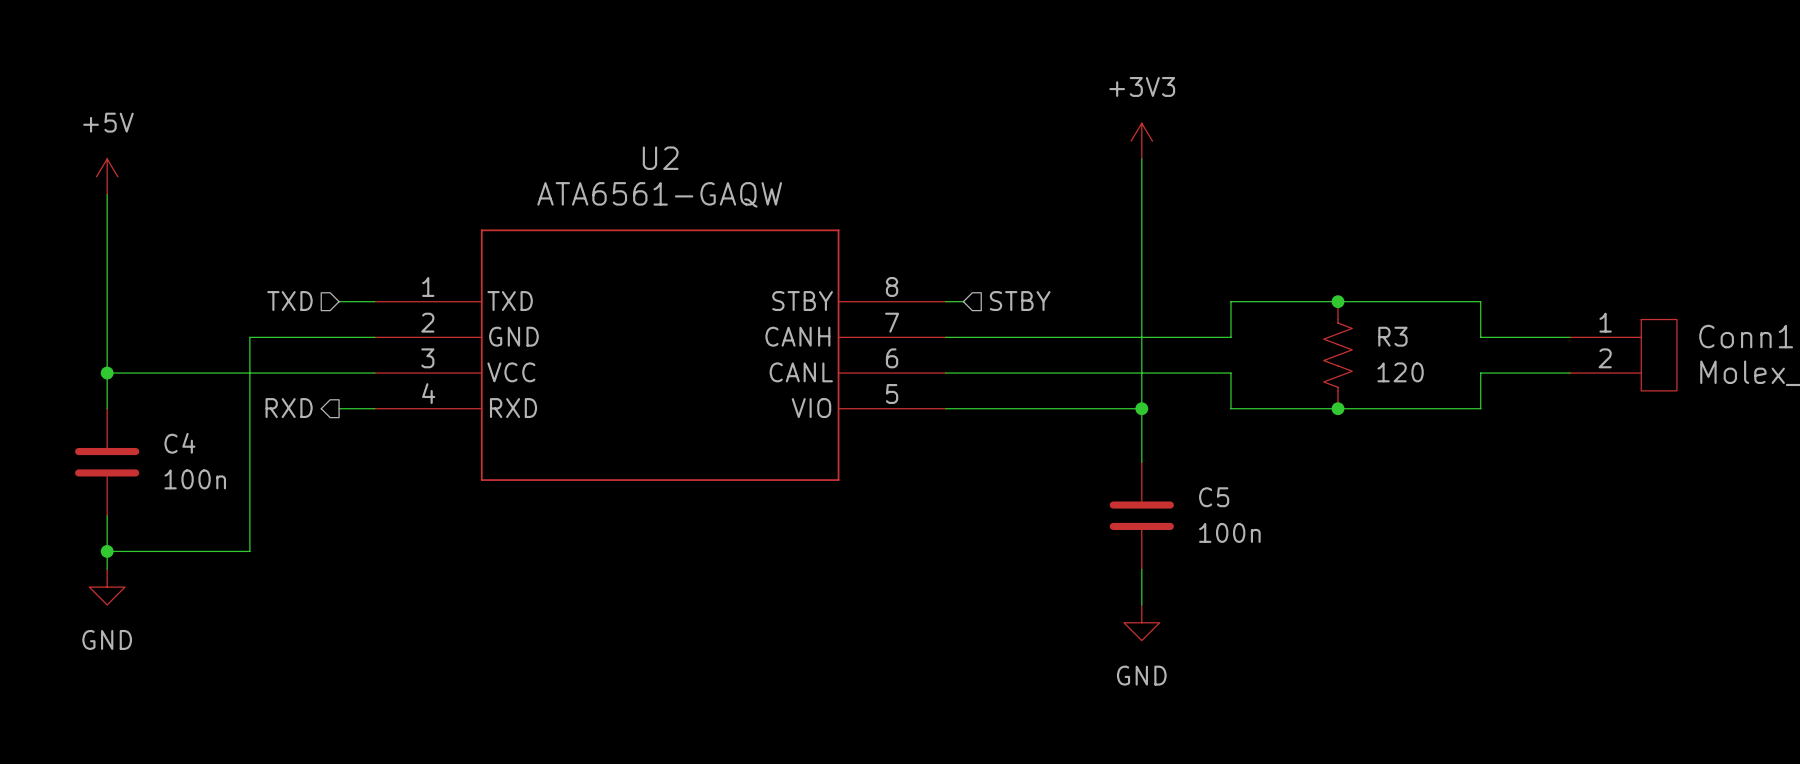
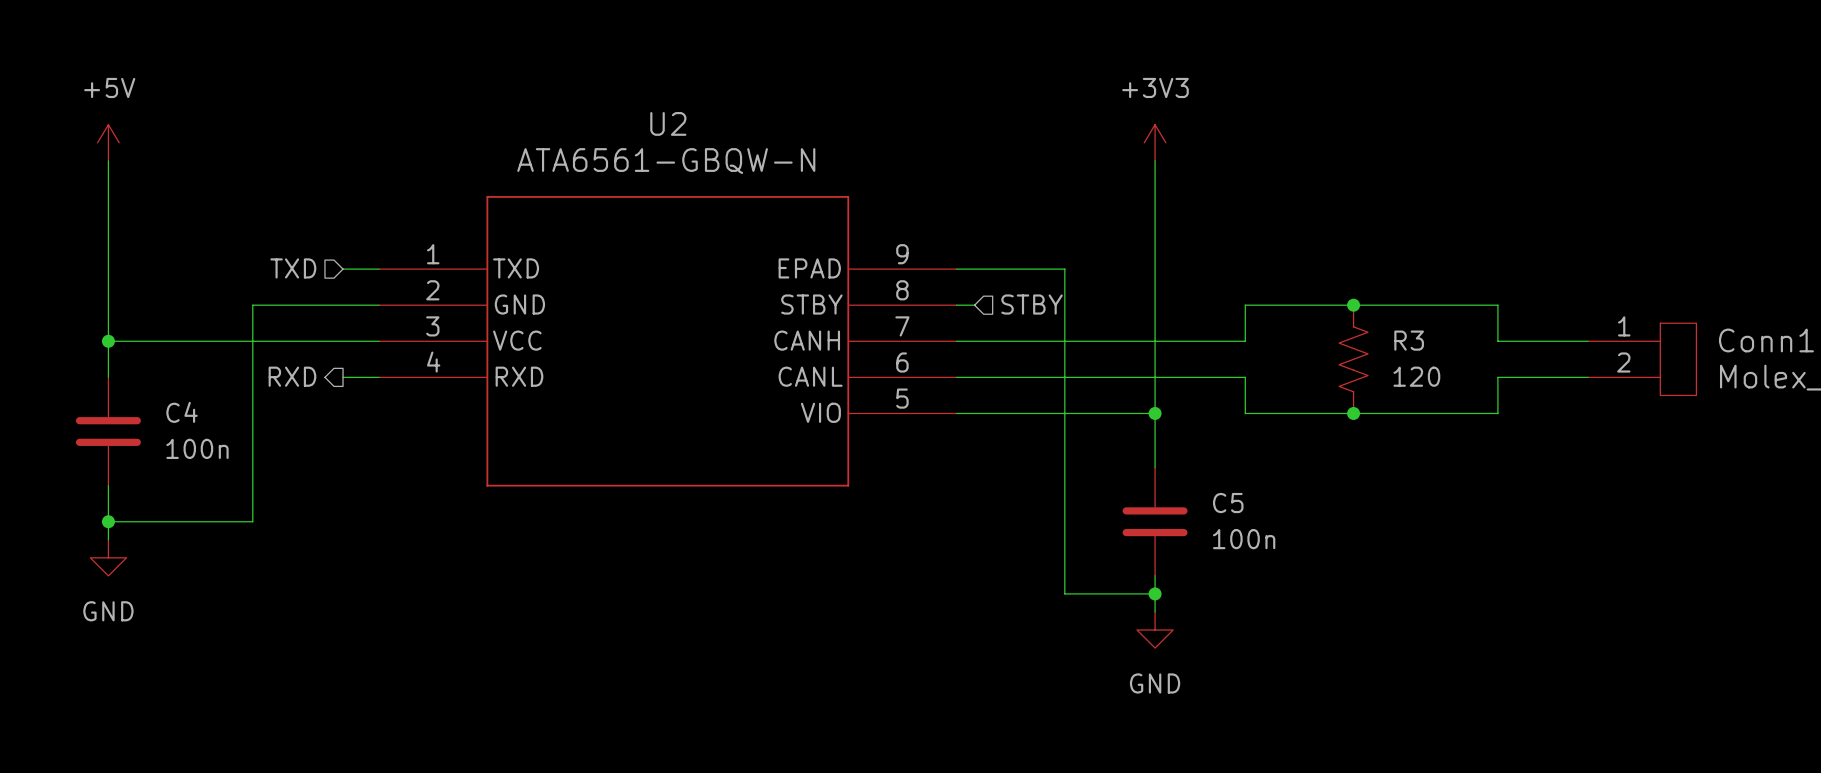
power symbol position: +5V (107, 176) -> +5V (108, 142)
U2 value: ATA6561-GAQW (659, 194) -> ATA6561-GBQW-N (666, 161)
U2 symbol: [374, 229, 946, 481] -> [379, 196, 957, 487]
wire: none -> (956, 269) (1064, 269) (1064, 593) (1155, 593)
hierarchical label position: TXD (289, 301) -> TXD (293, 268)
wire: none -> (343, 305) (252, 305) (252, 341) (108, 341)
junction position: (107, 373) -> (108, 341)
wire: (339, 373) (107, 373) (107, 408) -> none
hierarchical label position: RXD (289, 408) -> RXD (292, 376)
wire: (339, 408) (374, 408) -> (343, 269) (379, 269)
C4 position: (107, 462) -> (108, 431)
wire: (249, 515) (249, 551) (107, 551) -> (252, 521) (108, 521) (108, 485)
junction position: (107, 551) -> (108, 521)
power symbol position: GND (107, 587) -> GND (108, 557)
junction: none -> (1155, 593)

